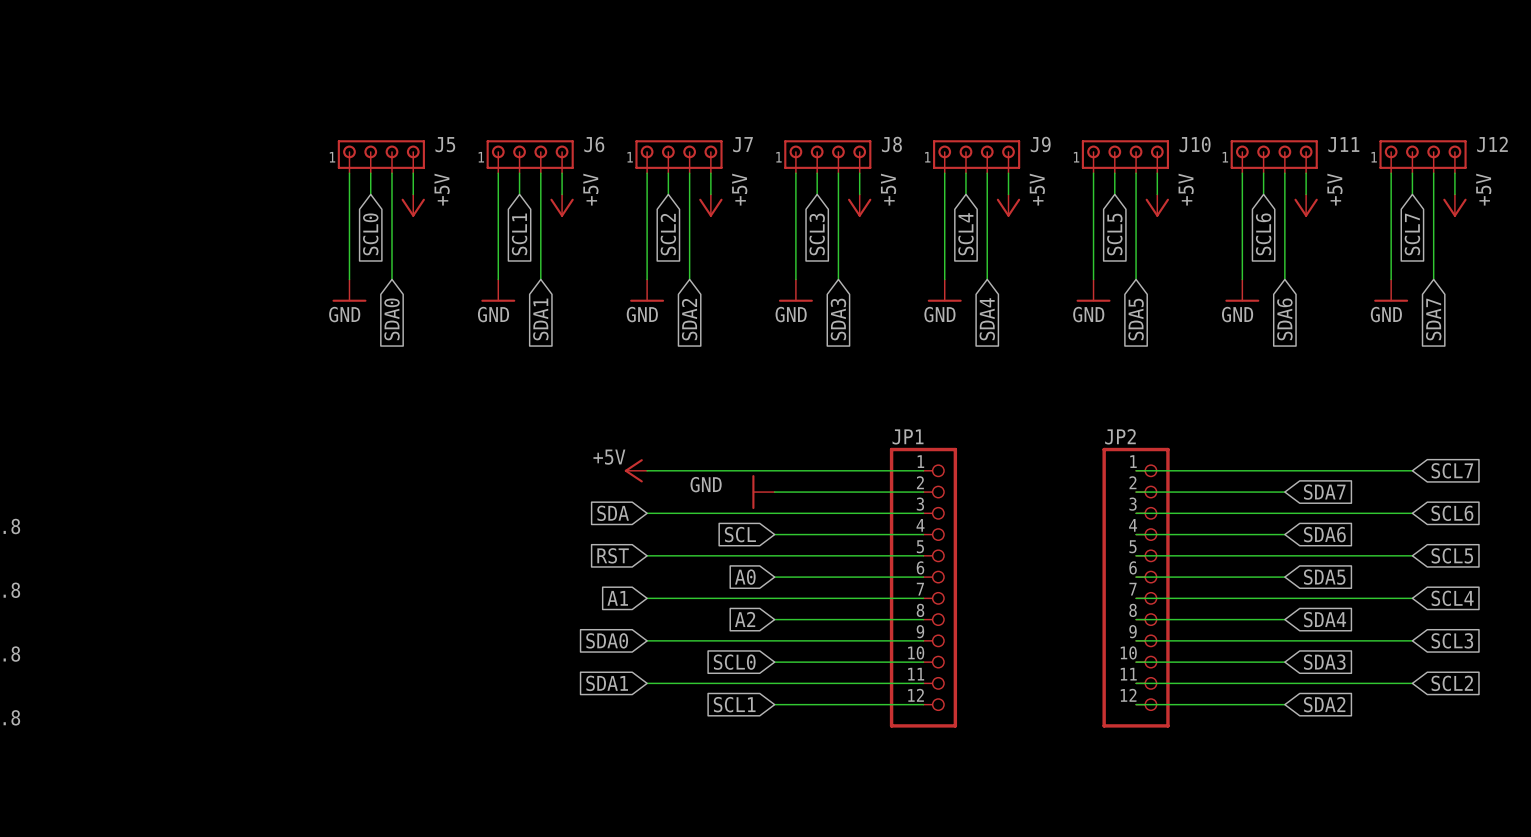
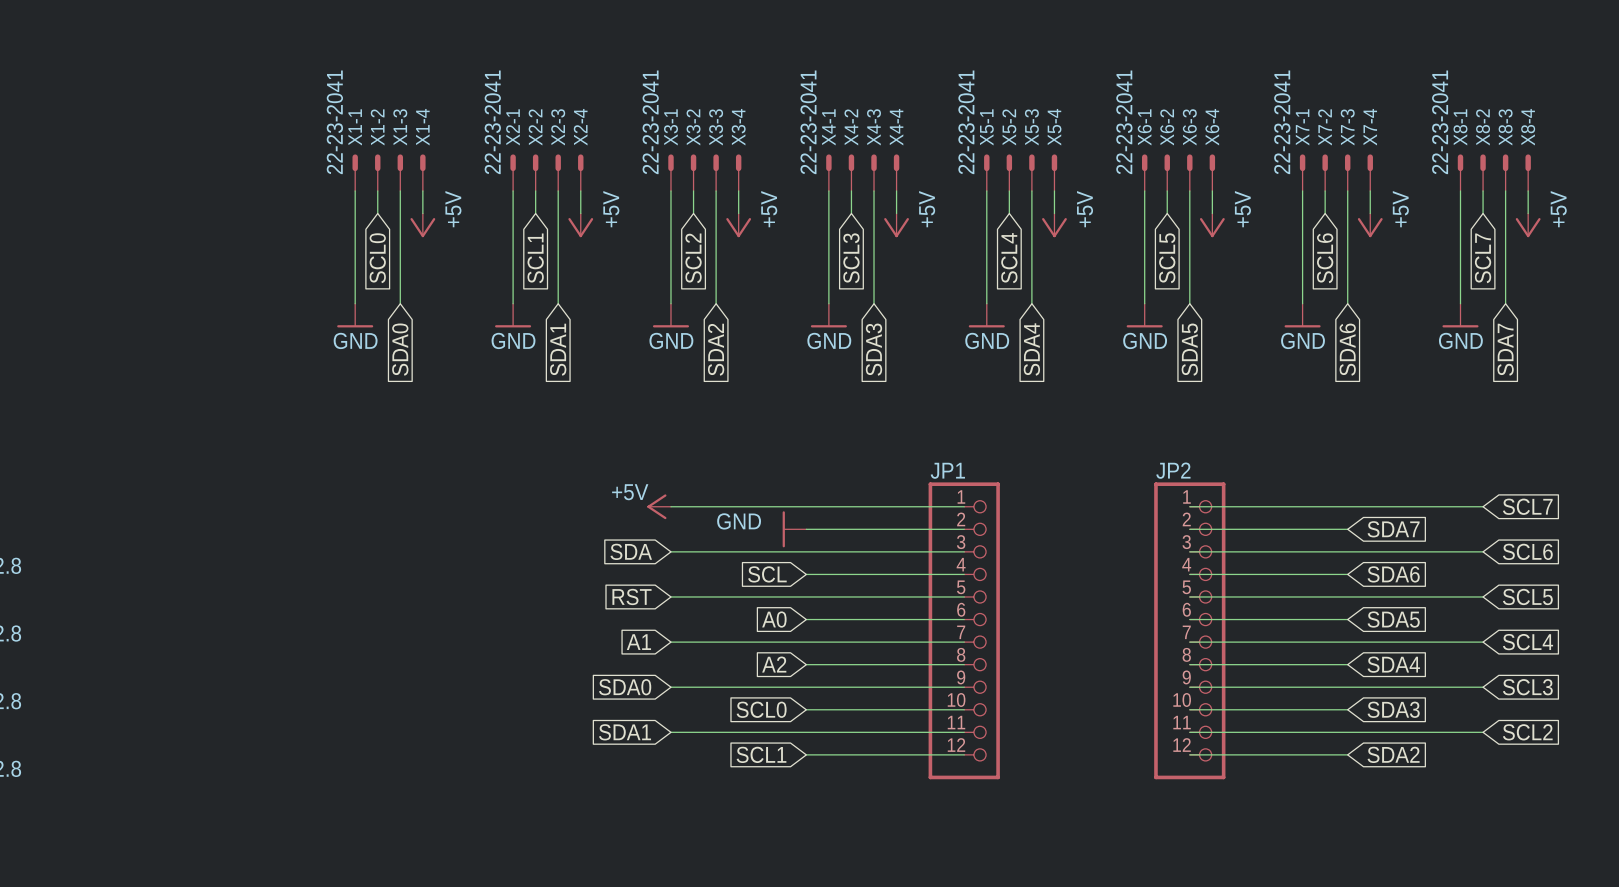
X1-1: none -> 22-23-2041 (355, 172)
X1-2: none -> (377, 172)
X1-3: none -> (400, 172)
X1-4: none -> (422, 172)
X2-1: none -> 22-23-2041 (513, 172)
X2-2: none -> (535, 172)
X2-3: none -> (558, 172)
X2-4: none -> (580, 172)
X3-1: none -> 22-23-2041 (670, 172)
X3-2: none -> (693, 172)
X3-3: none -> (716, 172)
X3-4: none -> (738, 172)
X4-1: none -> 22-23-2041 (828, 172)
X4-2: none -> (851, 172)
X4-3: none -> (874, 172)
X4-4: none -> (896, 172)
X5-1: none -> 22-23-2041 (986, 172)
X5-2: none -> (1009, 172)
X5-3: none -> (1031, 172)
X5-4: none -> (1054, 172)
X6-1: none -> 22-23-2041 (1144, 172)
X6-2: none -> (1167, 172)
X6-3: none -> (1189, 172)
X6-4: none -> (1212, 172)
X7-1: none -> 22-23-2041 (1302, 172)
X7-2: none -> (1325, 172)
X7-3: none -> (1347, 172)
X7-4: none -> (1370, 172)
X8-1: none -> 22-23-2041 (1460, 172)
X8-2: none -> (1483, 172)
X8-3: none -> (1505, 172)
X8-4: none -> (1528, 172)
J5: (381, 156) -> none
J6: (530, 156) -> none
J7: (678, 156) -> none
J8: (827, 156) -> none
J9: (976, 156) -> none
J10: (1125, 156) -> none
J11: (1274, 156) -> none
J12: (1423, 156) -> none

